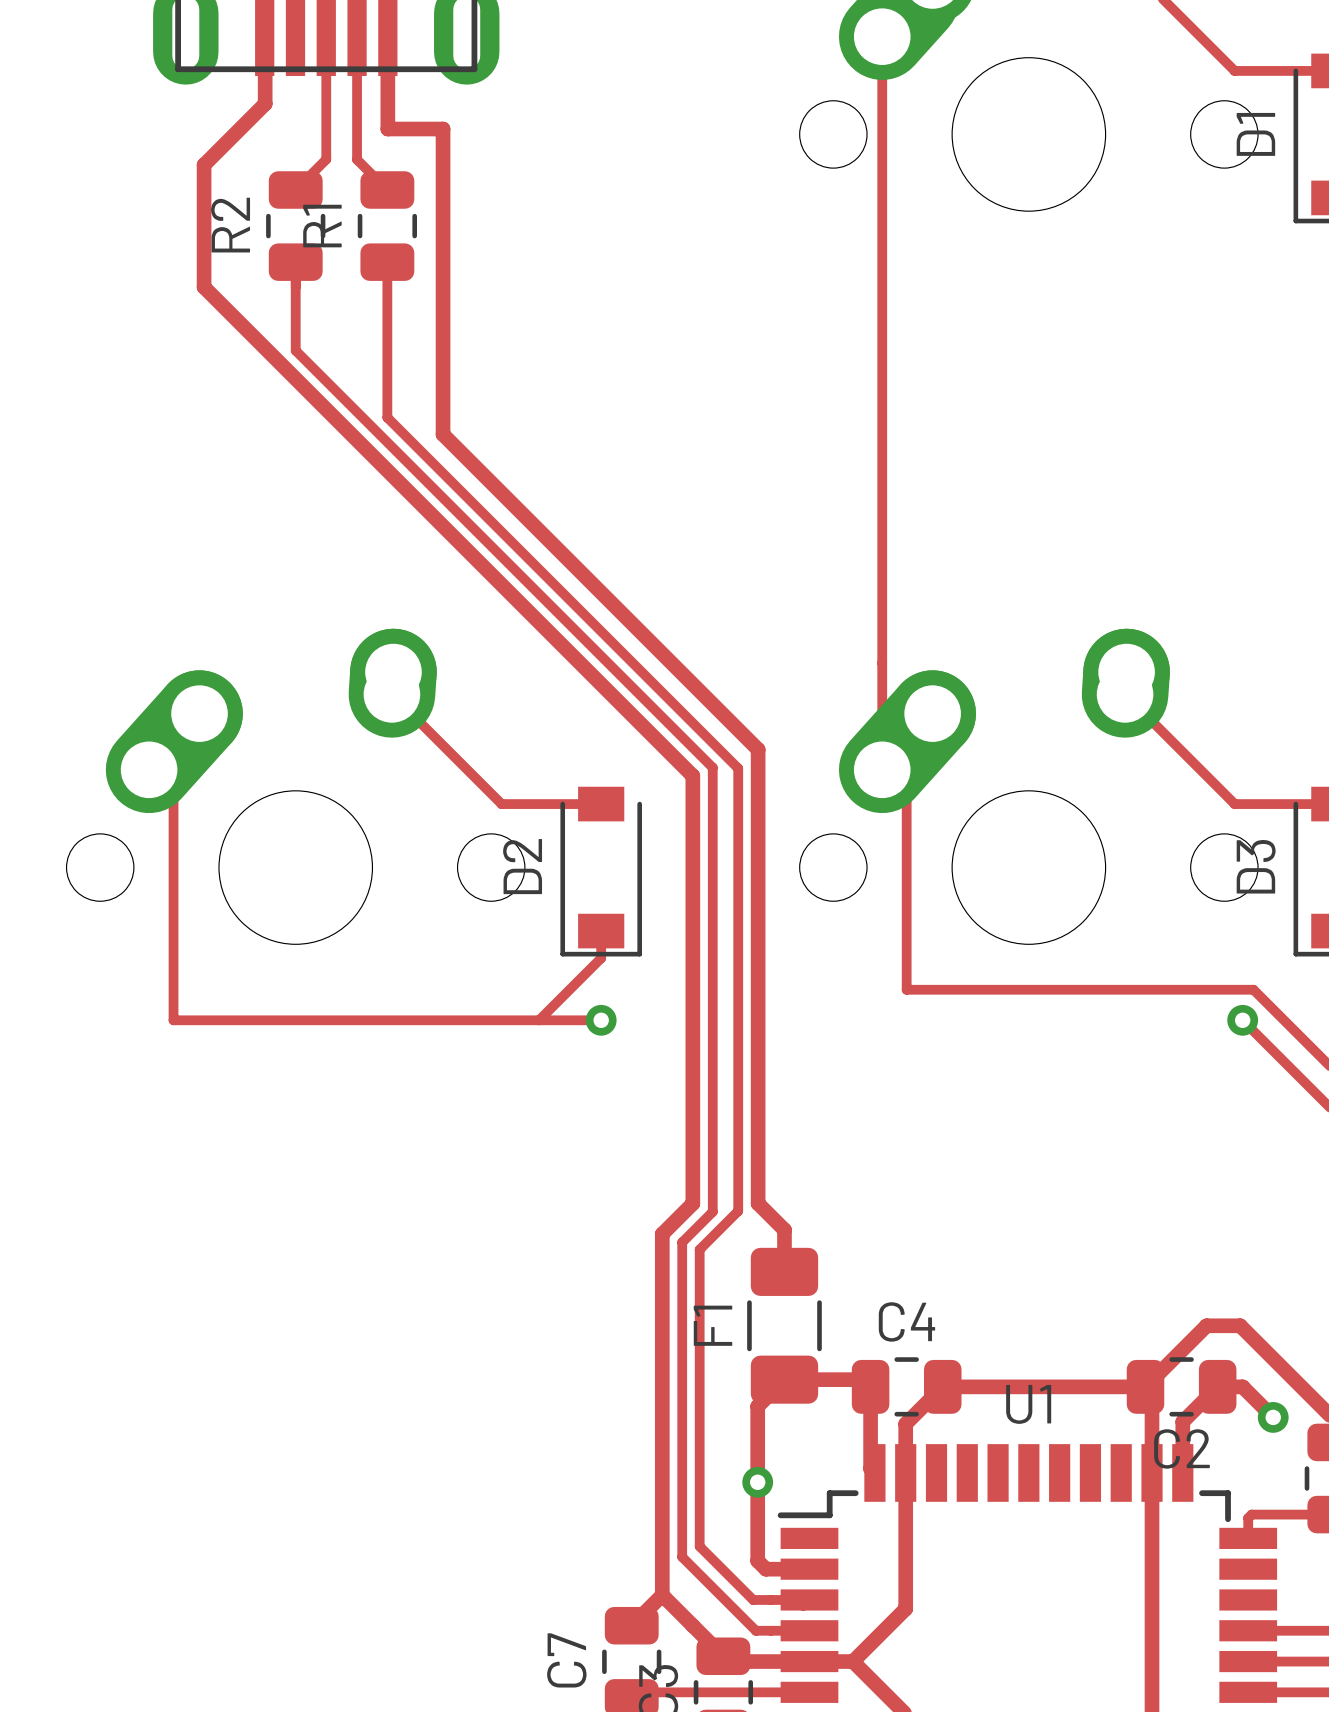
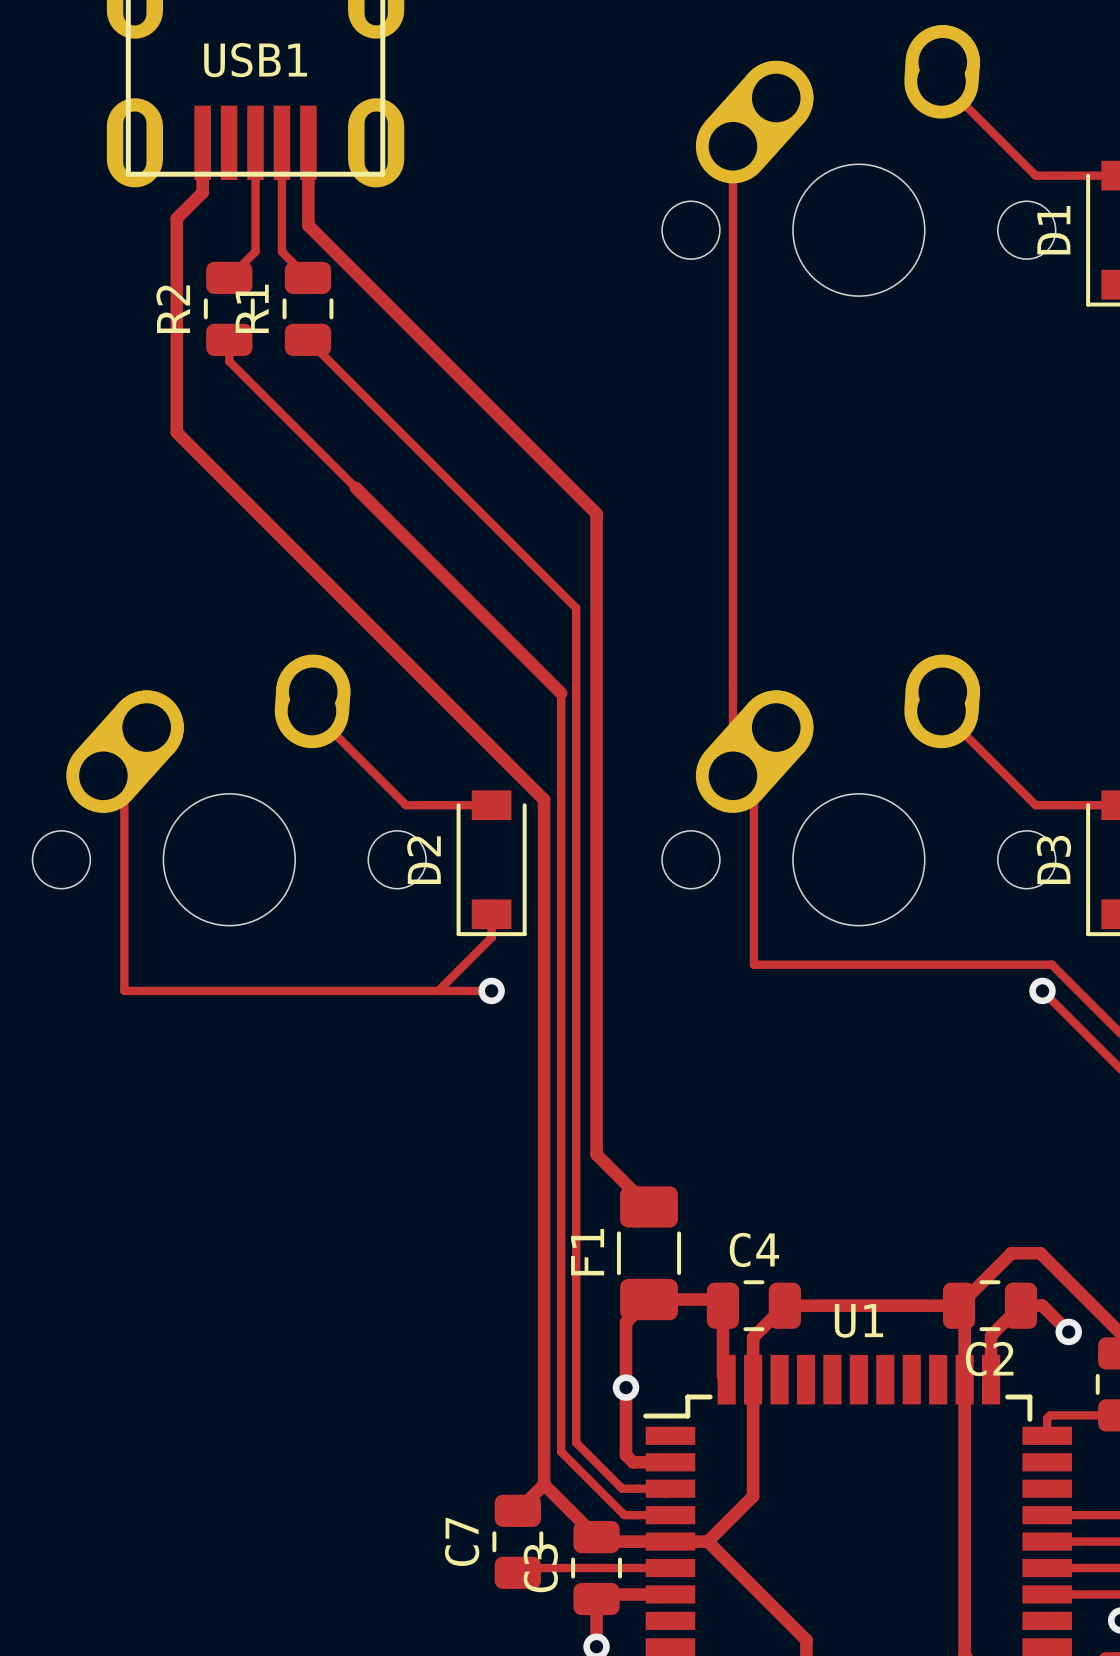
track: (265, 66) (265, 103) (204, 164) (204, 287) (692, 775) (692, 1203) (662, 1234) -> (202, 171) (202, 192) (176, 218) (176, 432) (544, 799) (544, 1174)
track: (387, 129) (443, 129) (443, 434) -> (229, 361) (355, 487)
track: none -> (308, 225) (596, 513) (596, 1154) (649, 1206)
track: (387, 262) (387, 417) (738, 768) (738, 1211) (699, 1249) -> (307, 339) (576, 608) (576, 1187)
track: (295, 287) (295, 350) (712, 767) (712, 1211) (682, 1242) -> none
track: (682, 673) (758, 749) (758, 1203) (784, 1229) (784, 1271) -> (561, 693) (561, 1181)

